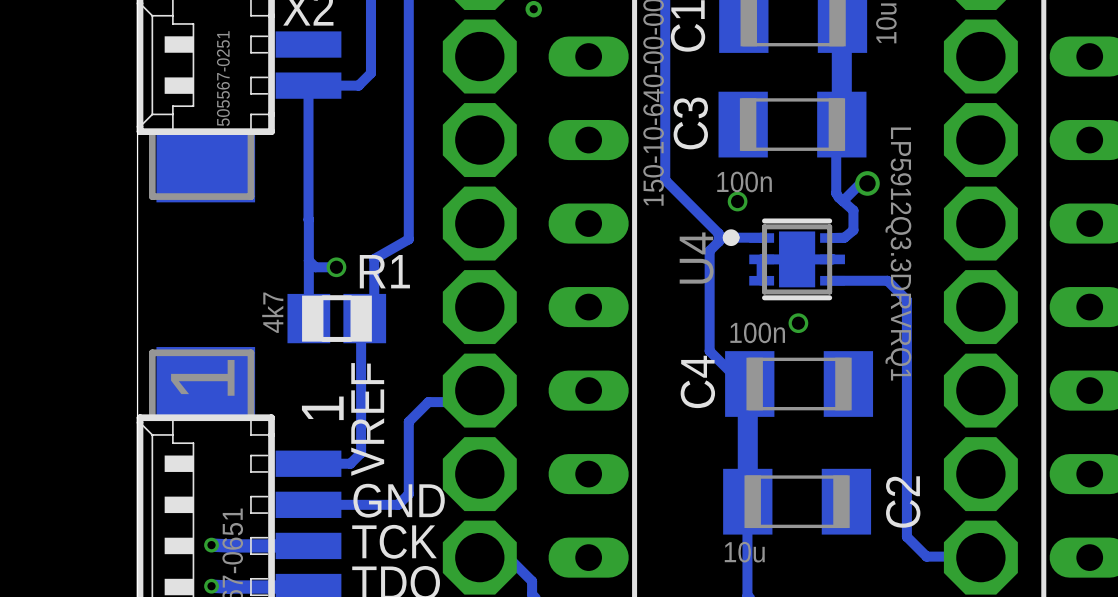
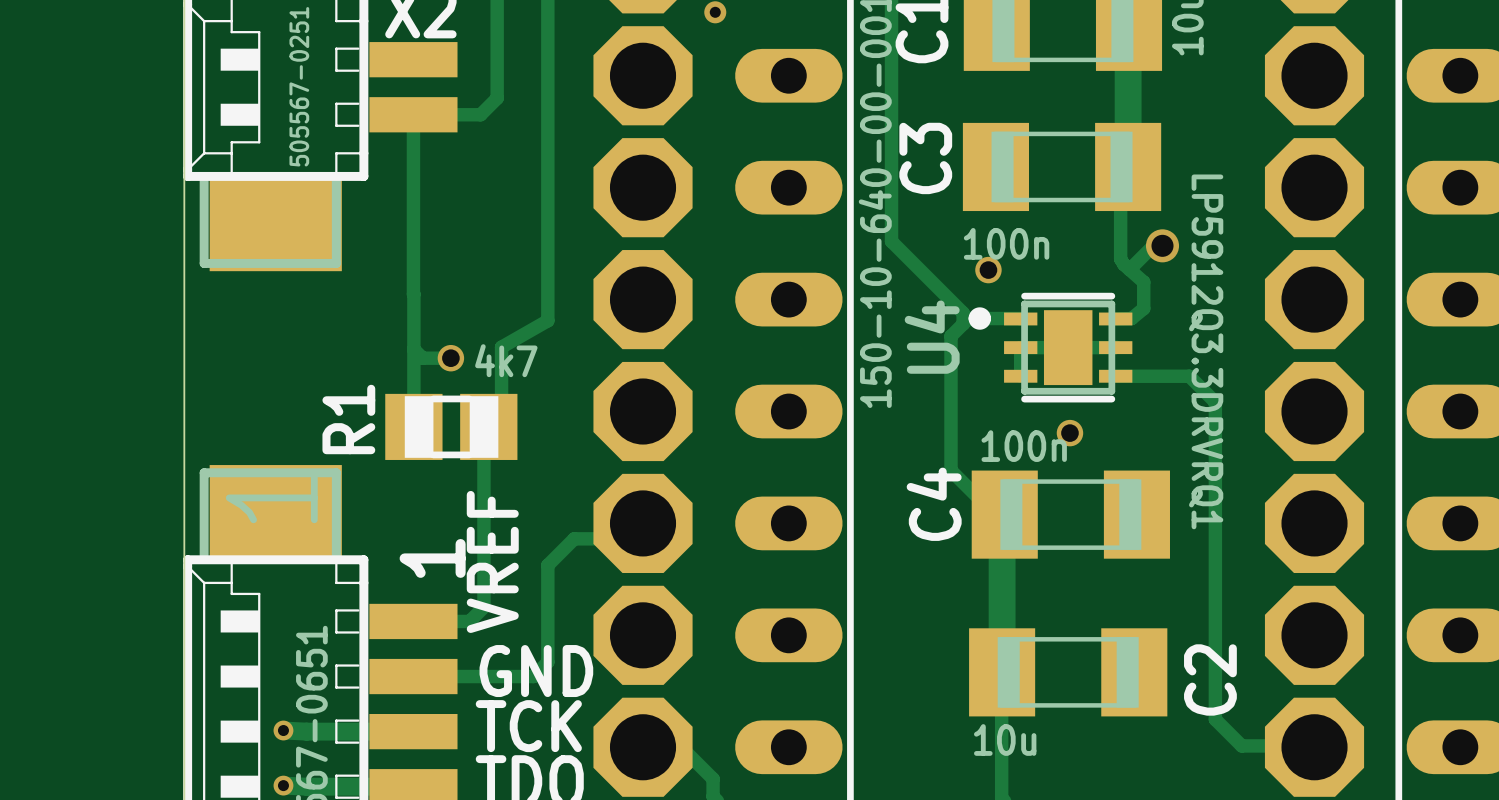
R1 name rotation: 0° (384, 271) -> 90° counterclockwise (348, 419)
R1 name position: R1 (384, 271) -> R1 (348, 419)
R1 value rotation: 0° (272, 312) -> 90° clockwise (506, 360)
R1 value position: 4k7 (272, 312) -> 4k7 (506, 360)

